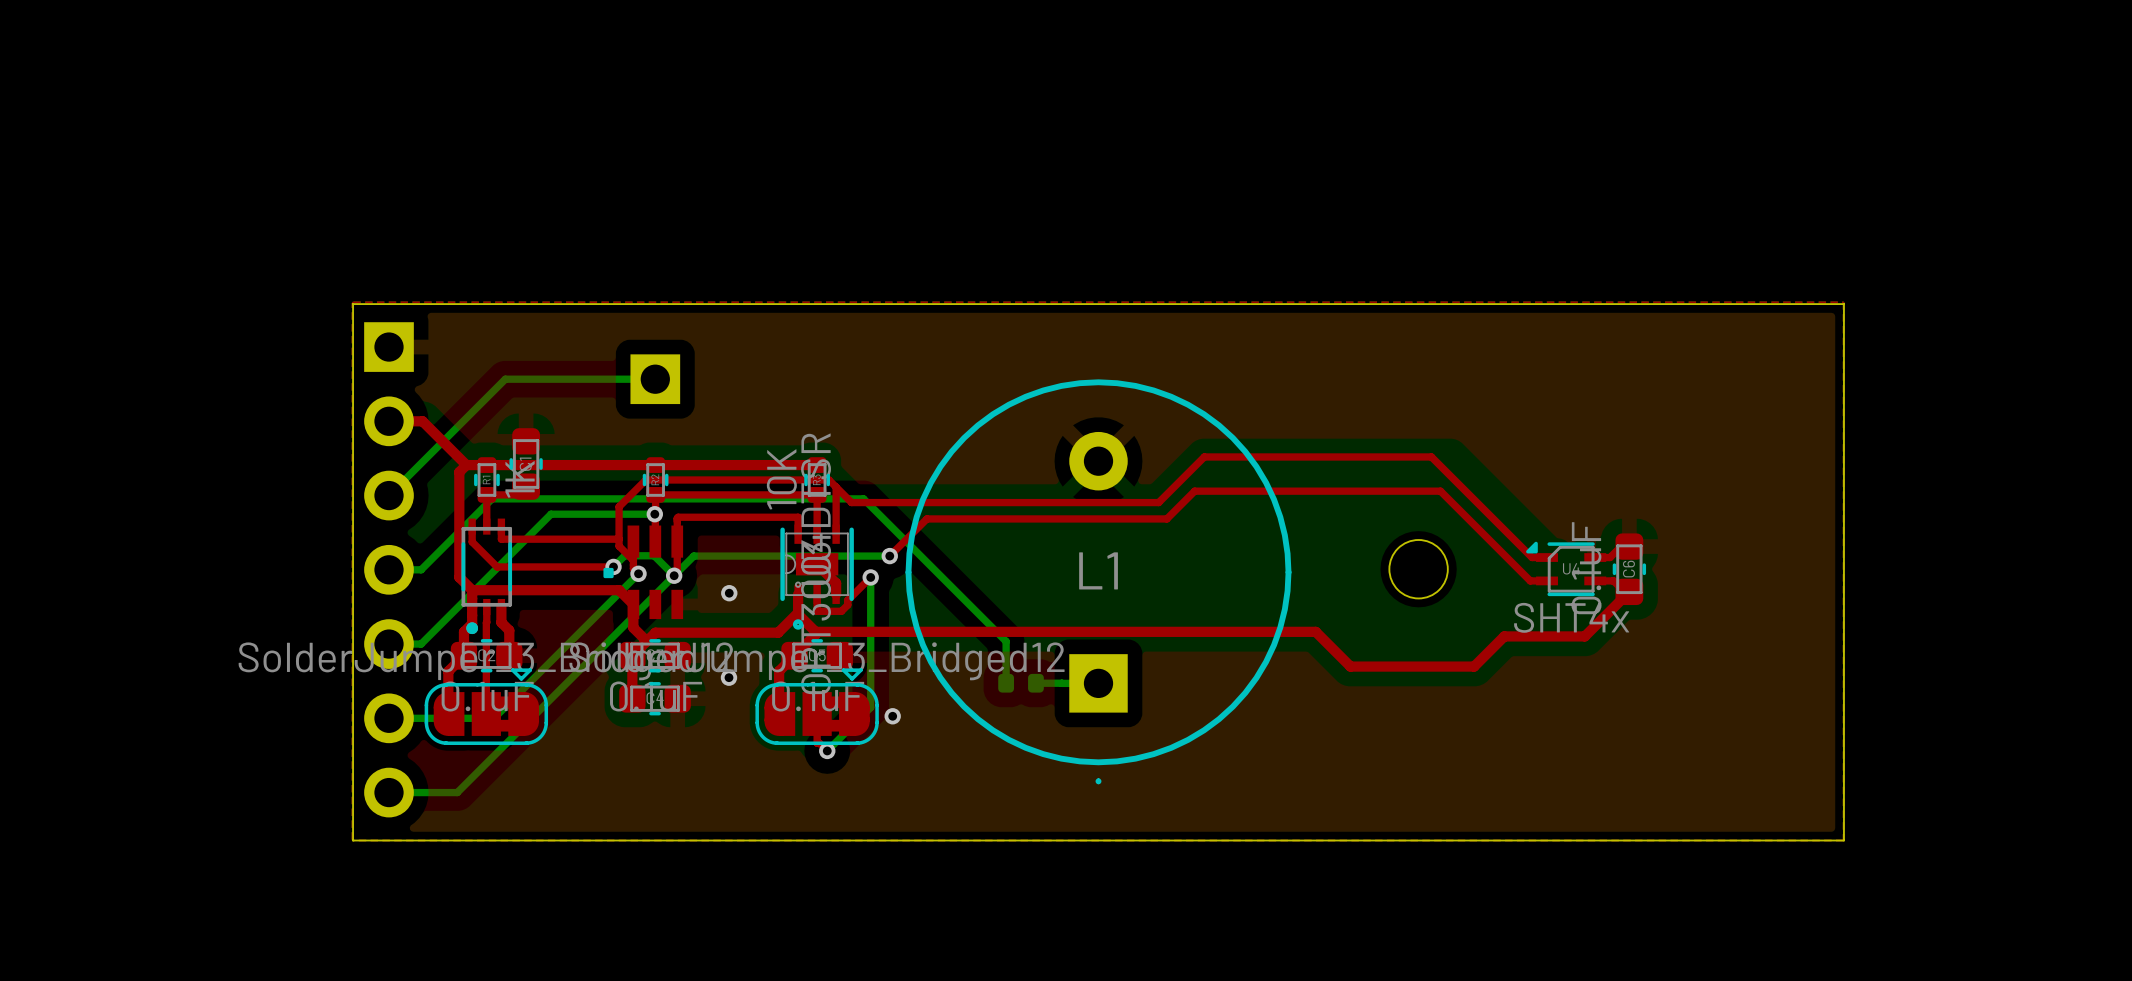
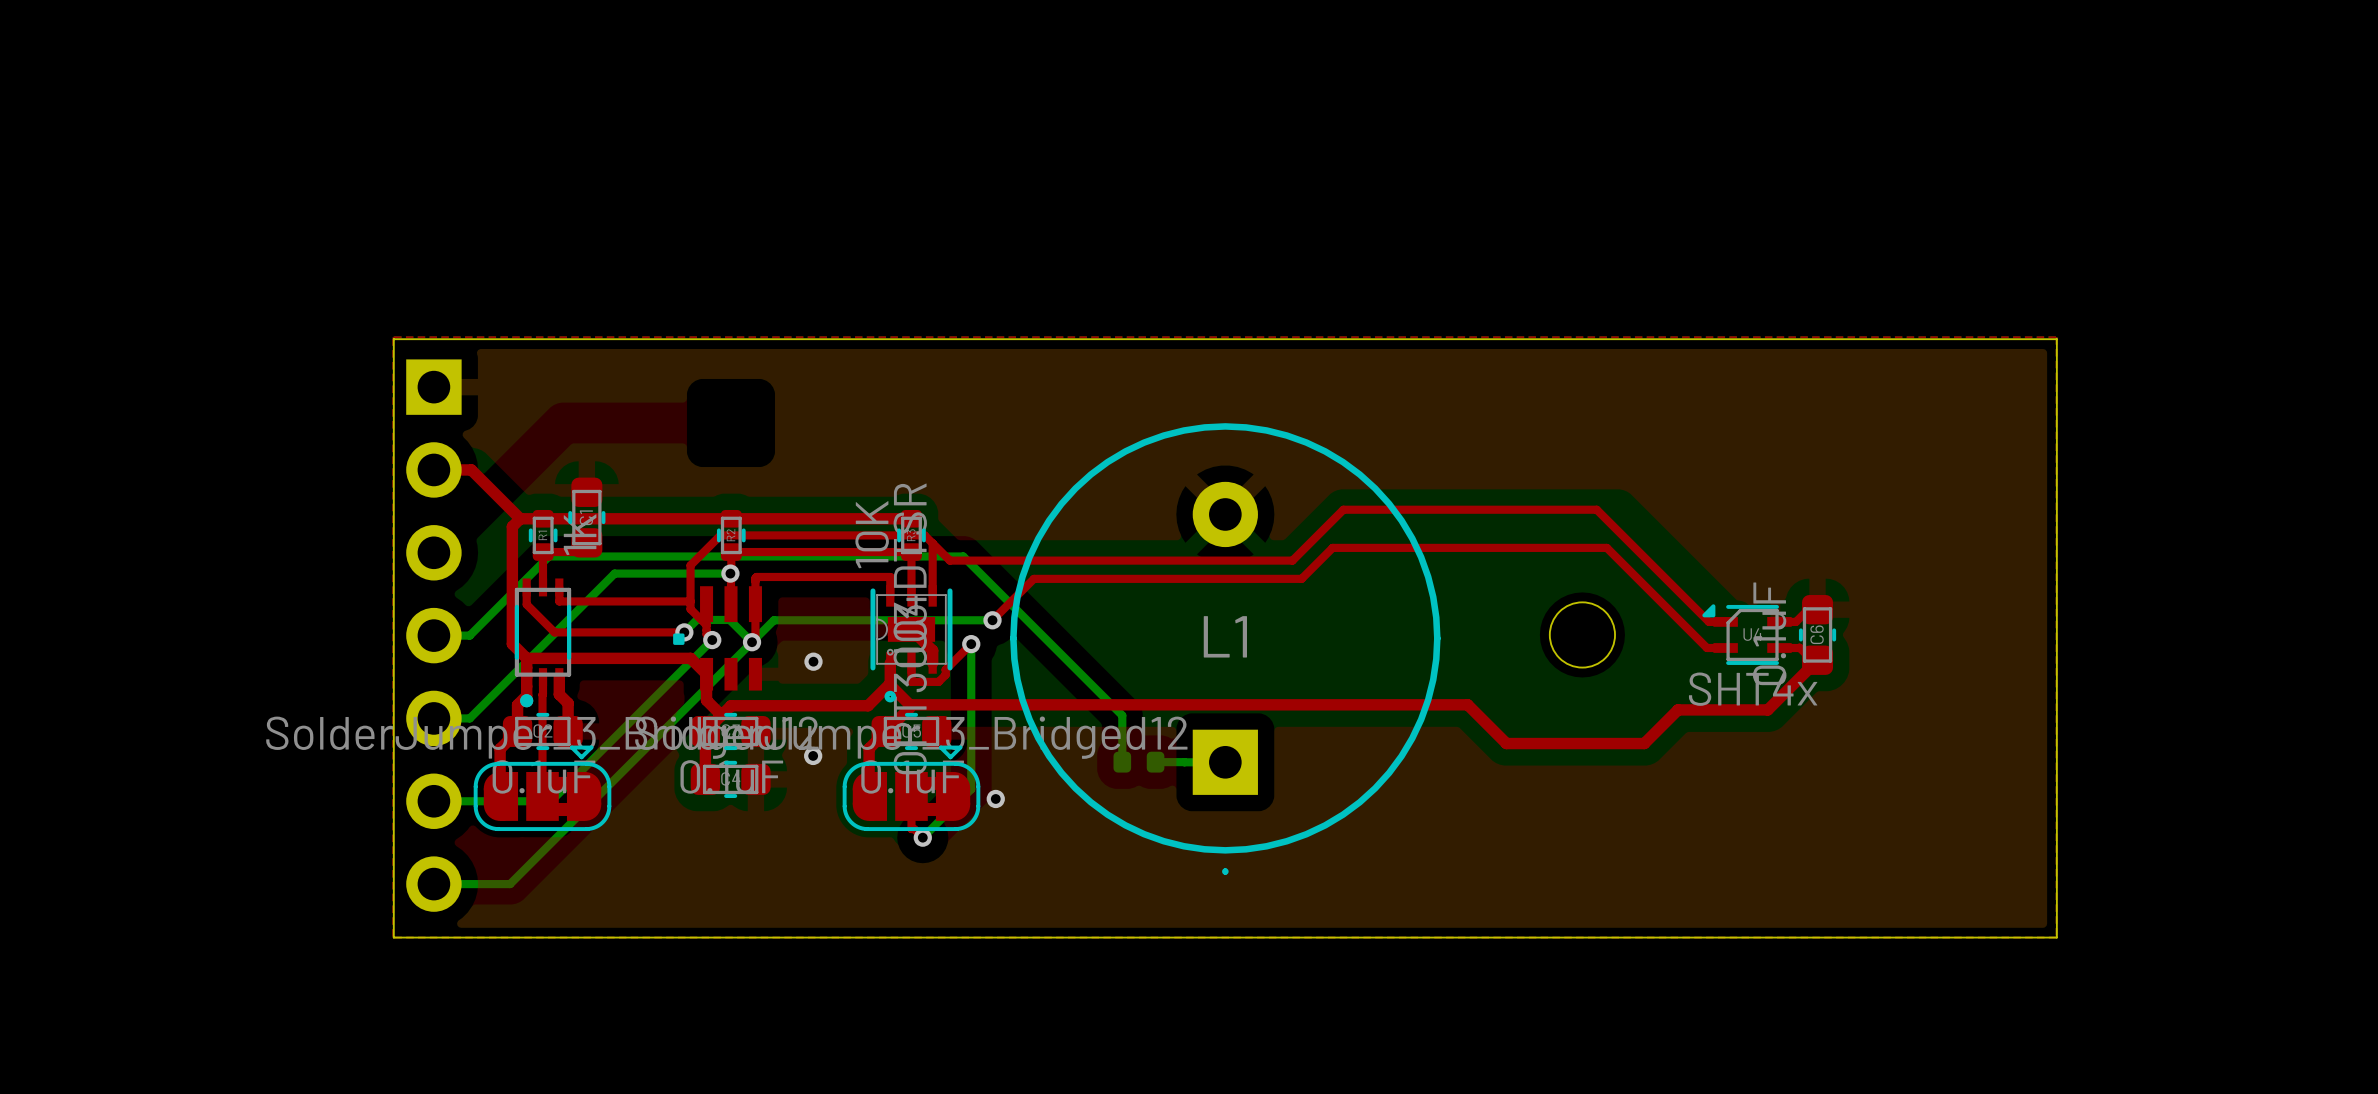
bottom track: (655, 379) (505, 379) (389, 495) -> none
part: (655, 379) -> none

